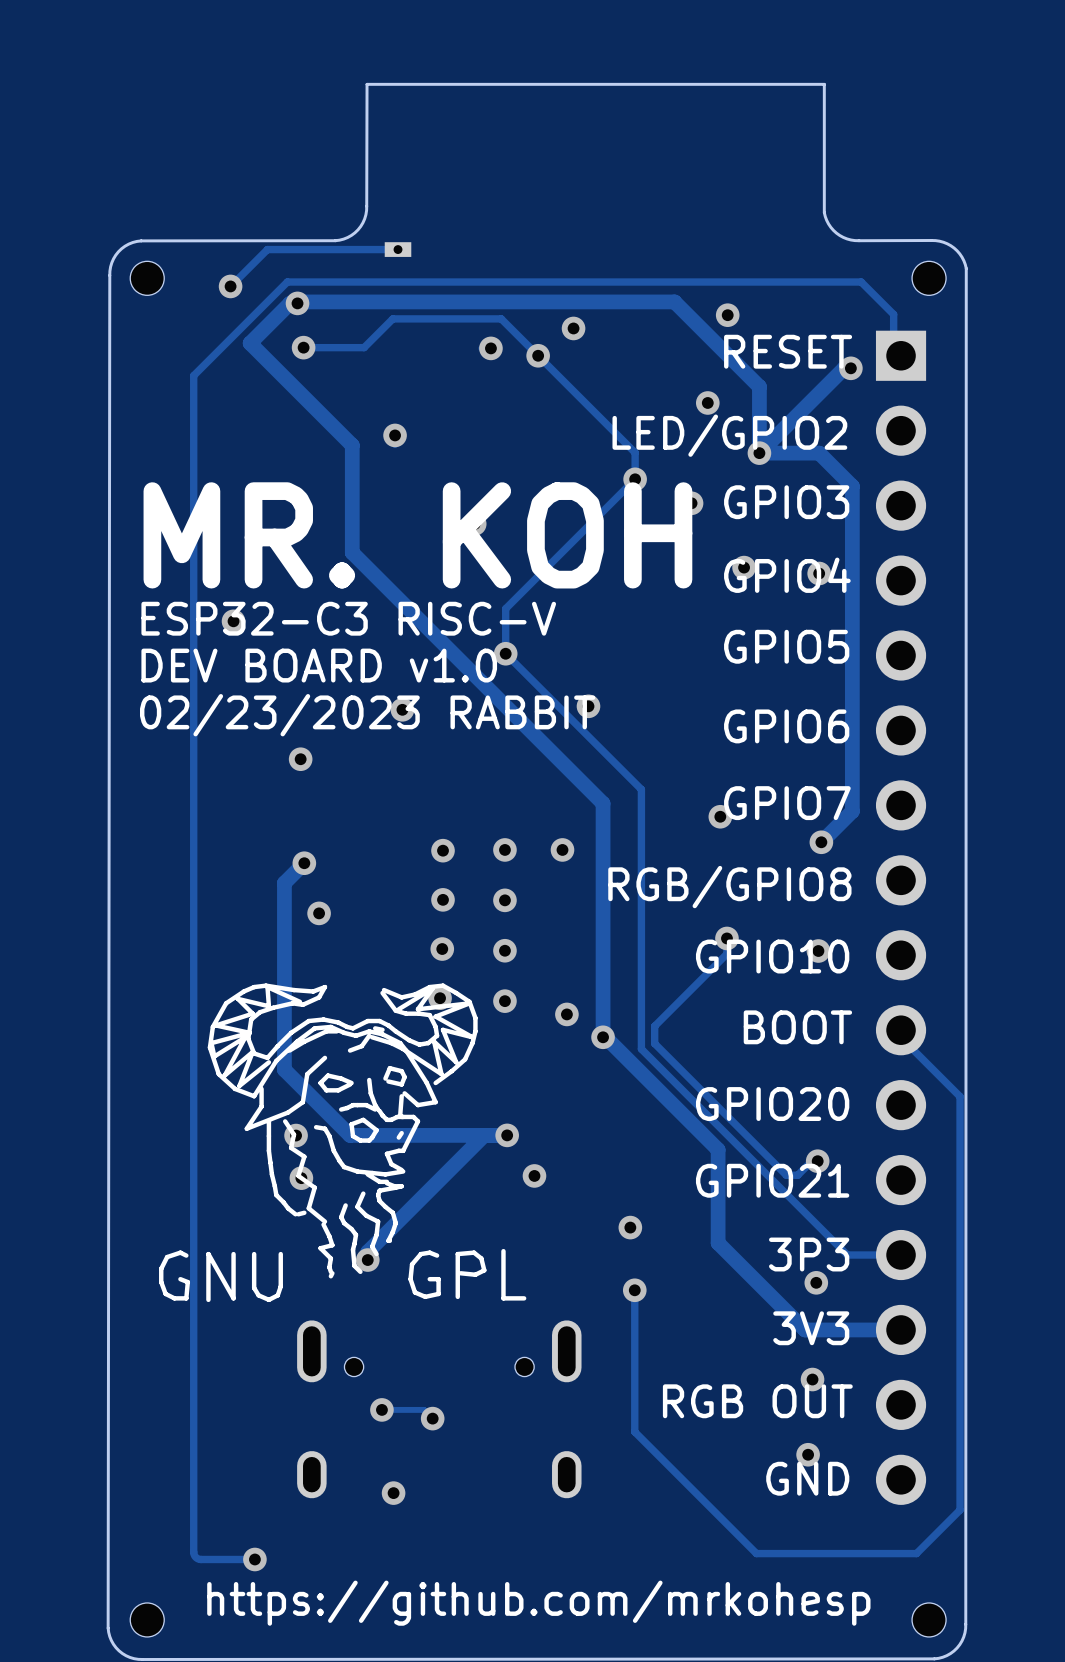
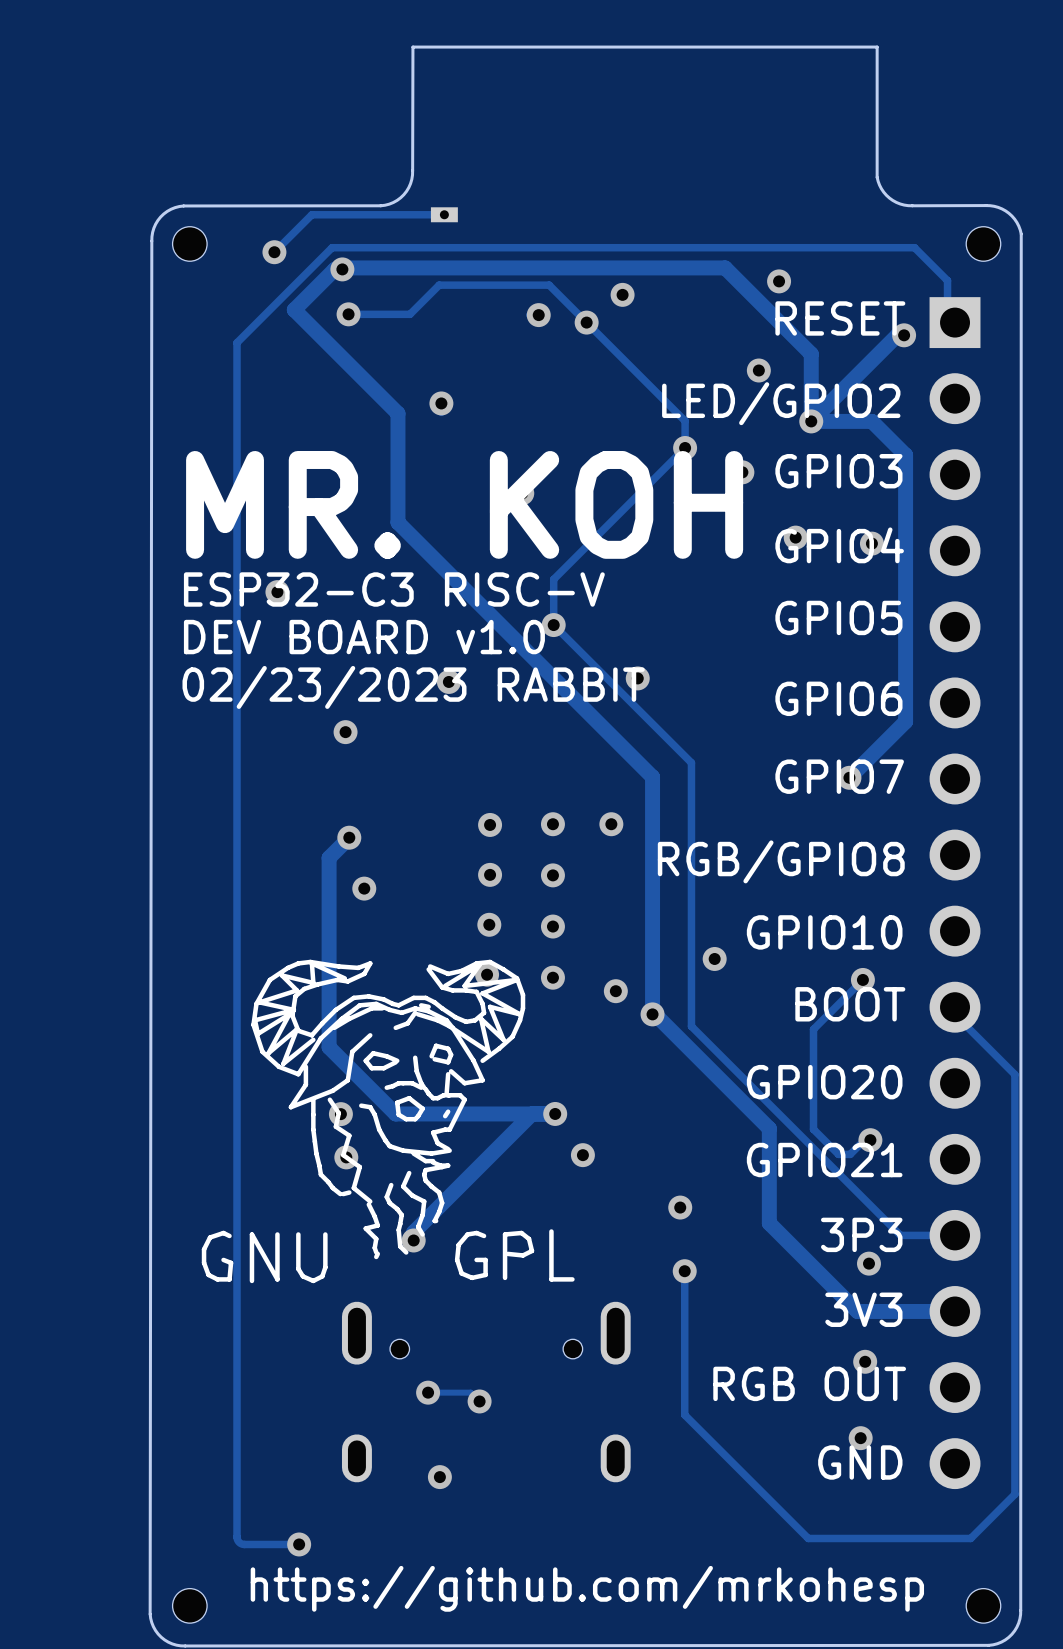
track: (852, 748) (852, 811) (821, 842) -> (905, 721) (849, 777)
via: none -> (849, 777)
via: (720, 816) -> none
via: (821, 842) -> none
track: (726, 938) (726, 953) (654, 1026) (654, 1043) (761, 1150) -> (862, 979) (813, 1029) (813, 1129)
via: (726, 938) -> none
via: (818, 951) -> none
via: none -> (714, 958)
via: none -> (862, 979)

